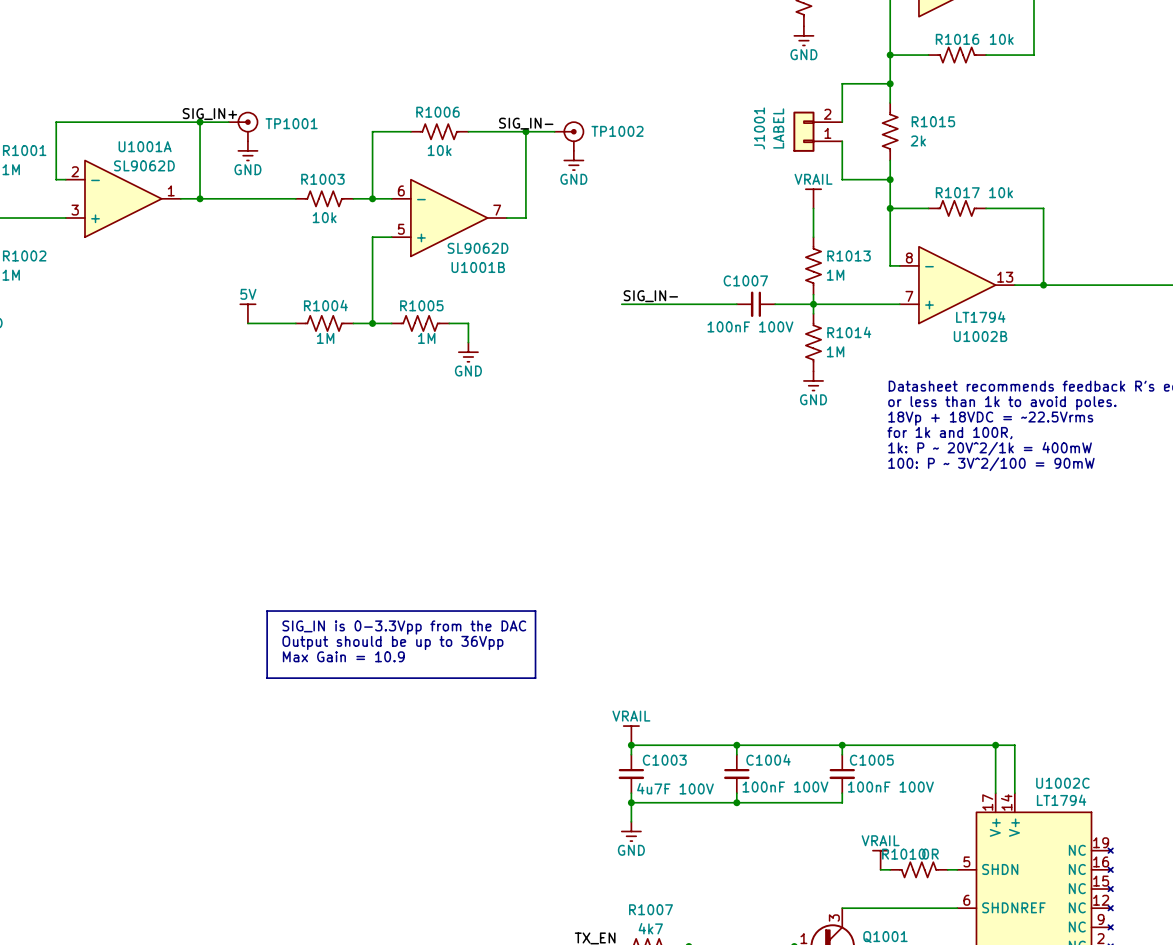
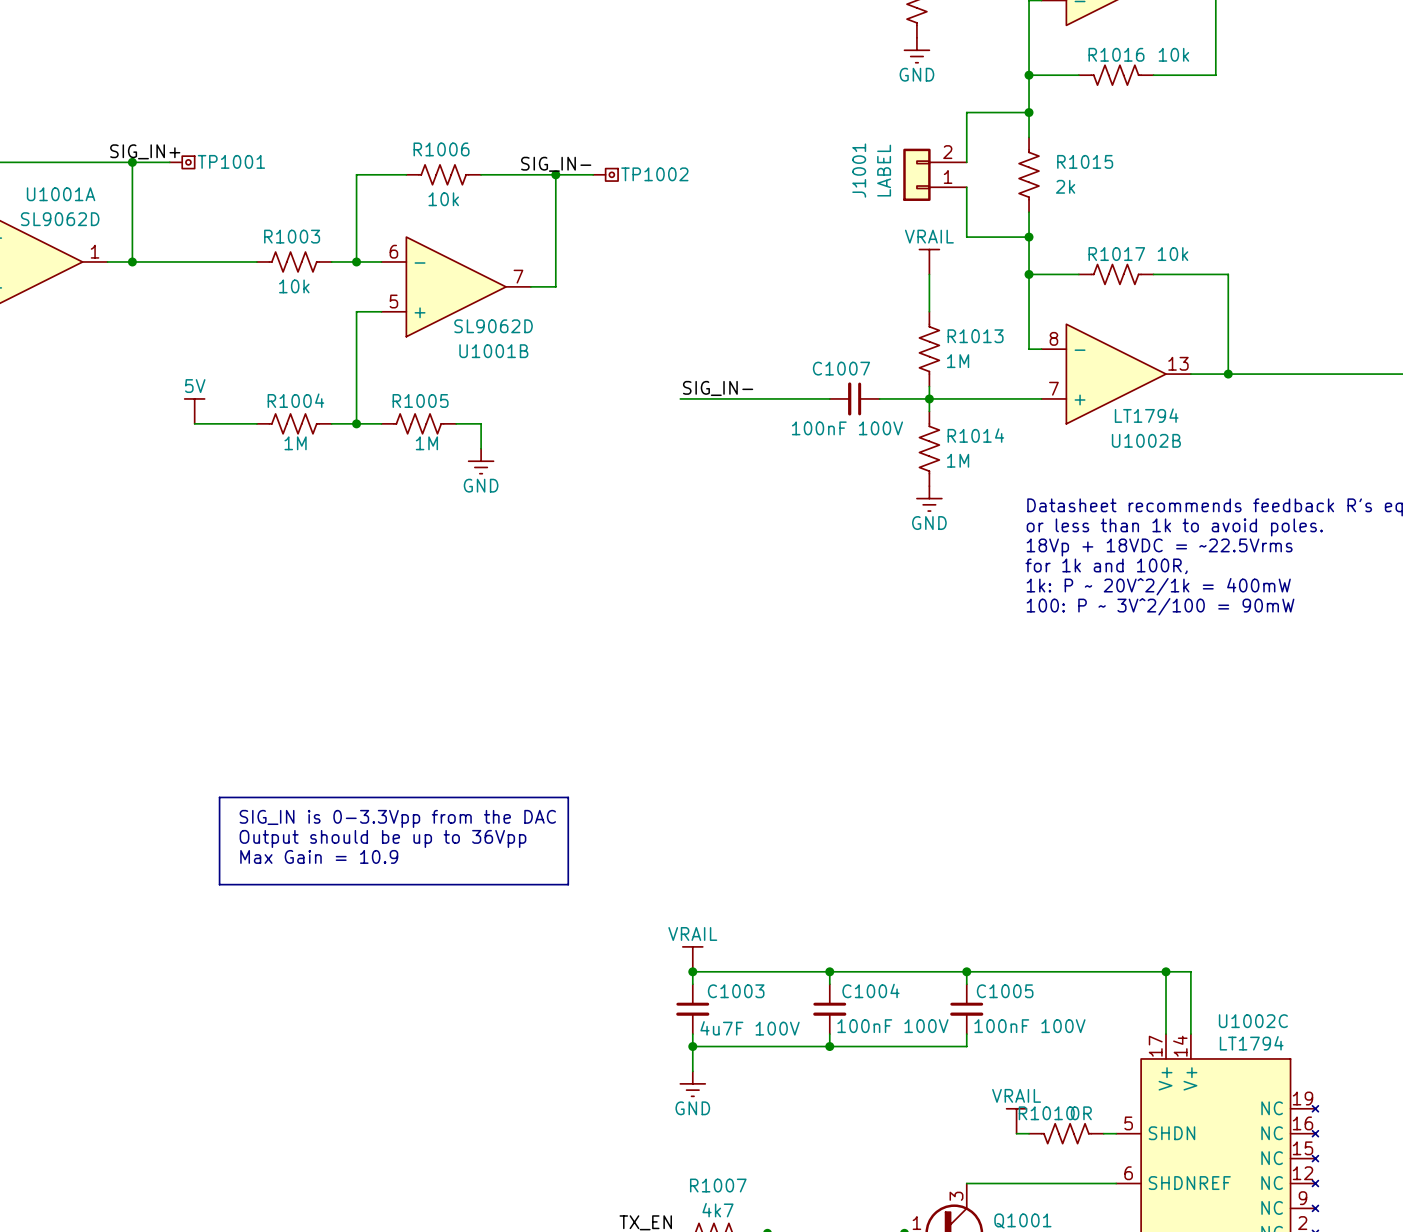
TP1001 symbol: [228, 112, 258, 142] -> [169, 156, 195, 169]
TP1002 symbol: [554, 122, 584, 151] -> [593, 168, 619, 182]
power symbol: GND (247, 150) -> none
power symbol: GND (573, 160) -> none

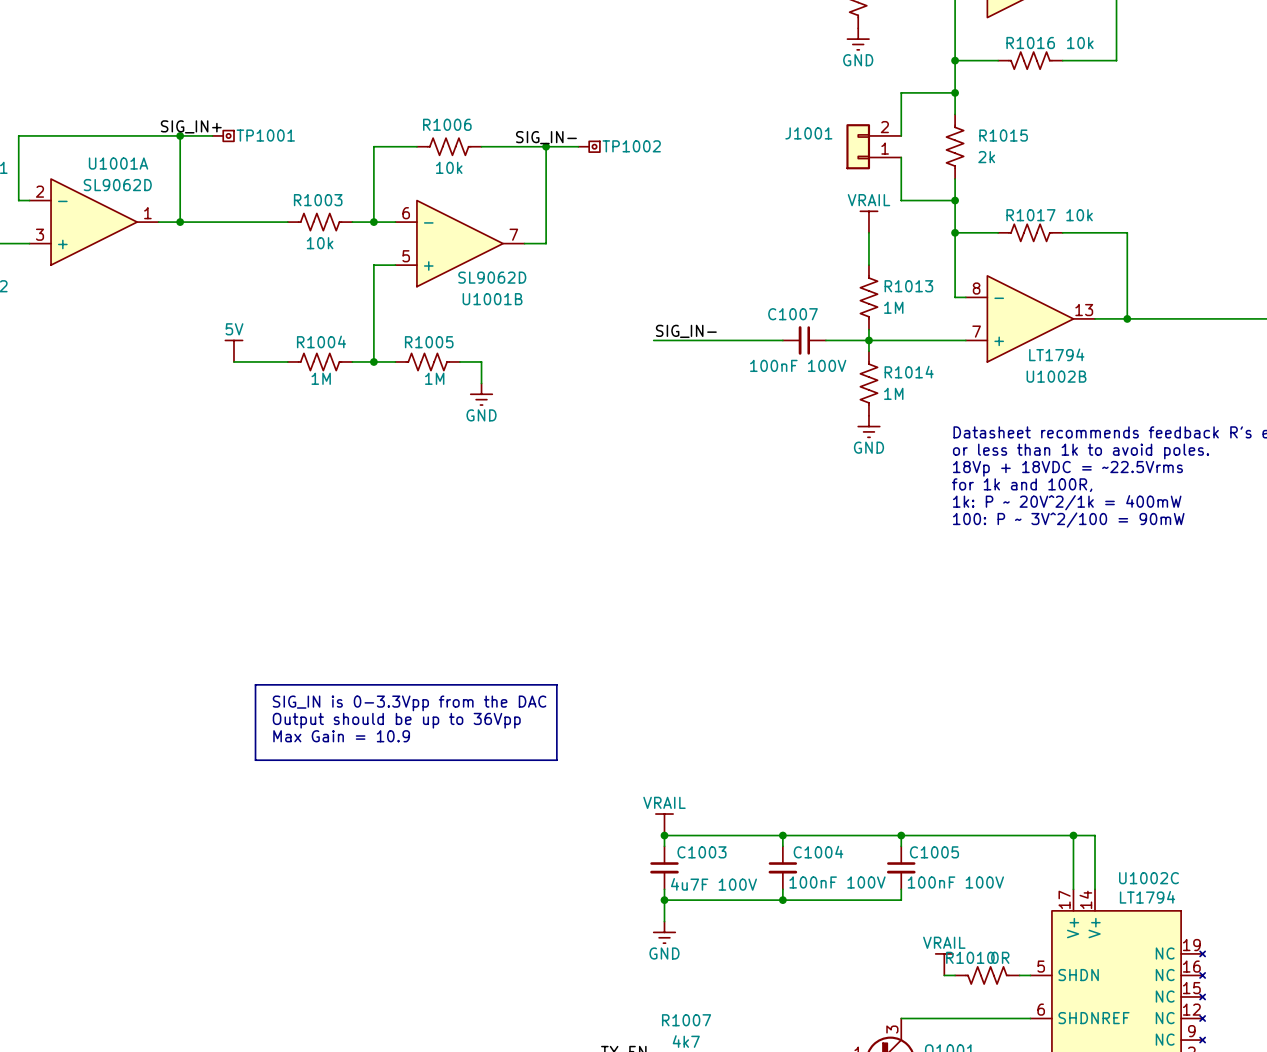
J1001 name rotation: 0° (859, 170) -> 90° clockwise (808, 133)
J1001 value: LABEL (884, 170) -> none

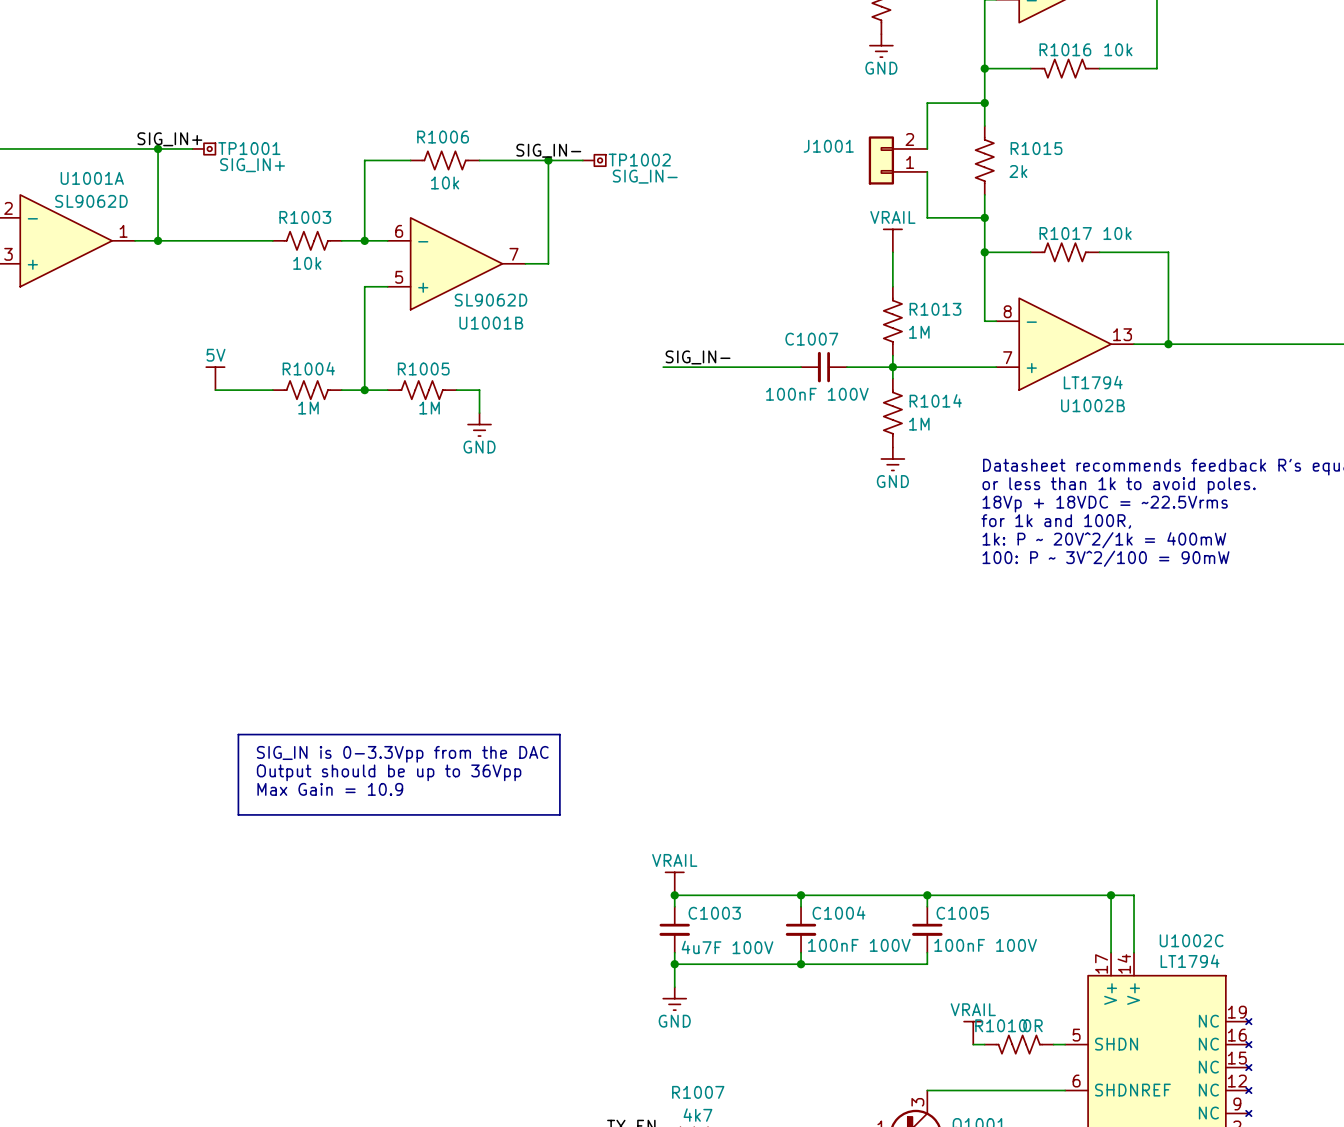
TP1001 value: none -> SIG_IN+ (252, 165)
TP1002 value: none -> SIG_IN- (645, 176)

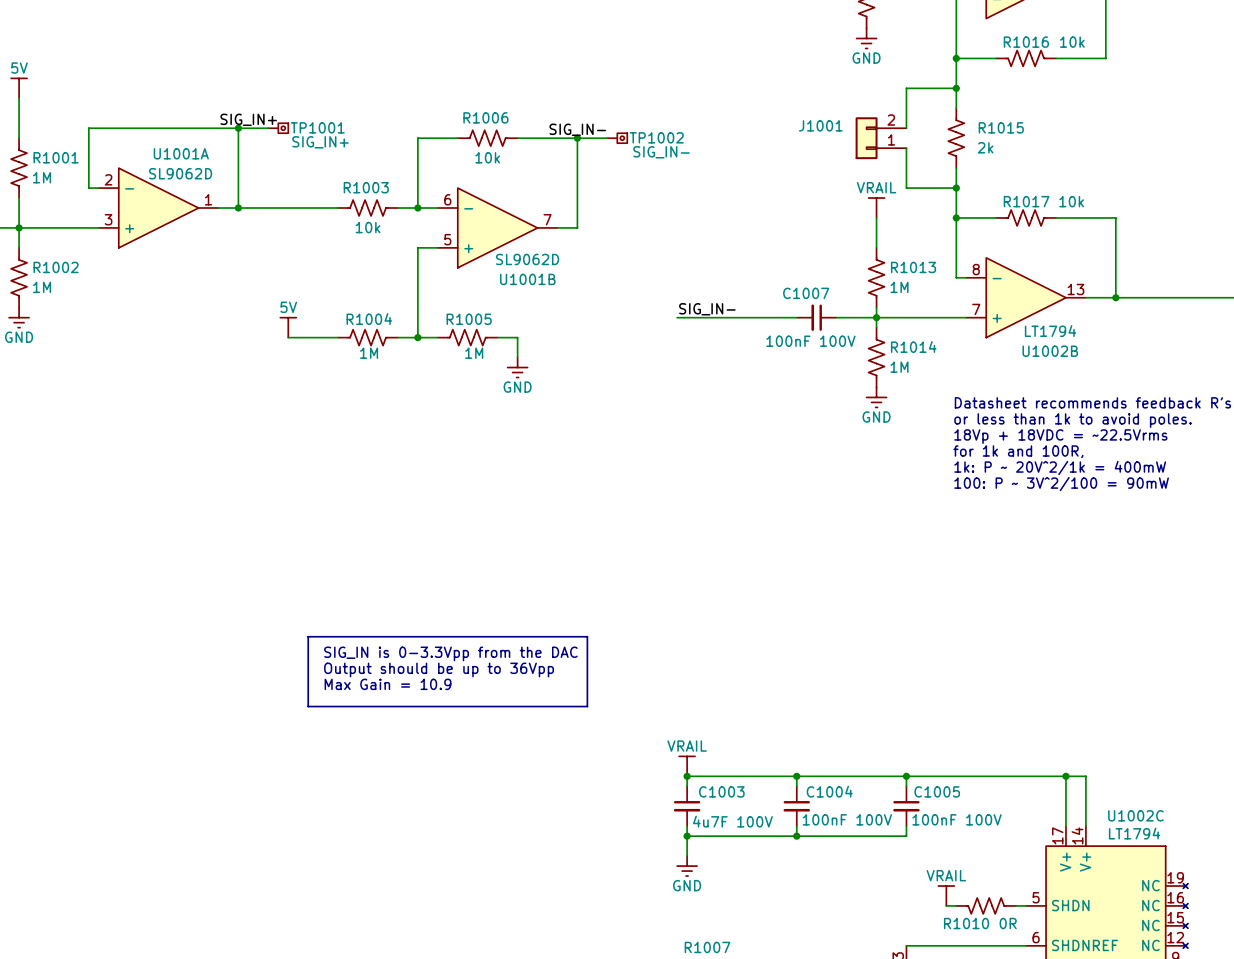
R1010 name position: R1010 (1001, 1025) -> R1010 (966, 923)
R1010 value position: 0R (1032, 1025) -> 0R (1008, 923)

